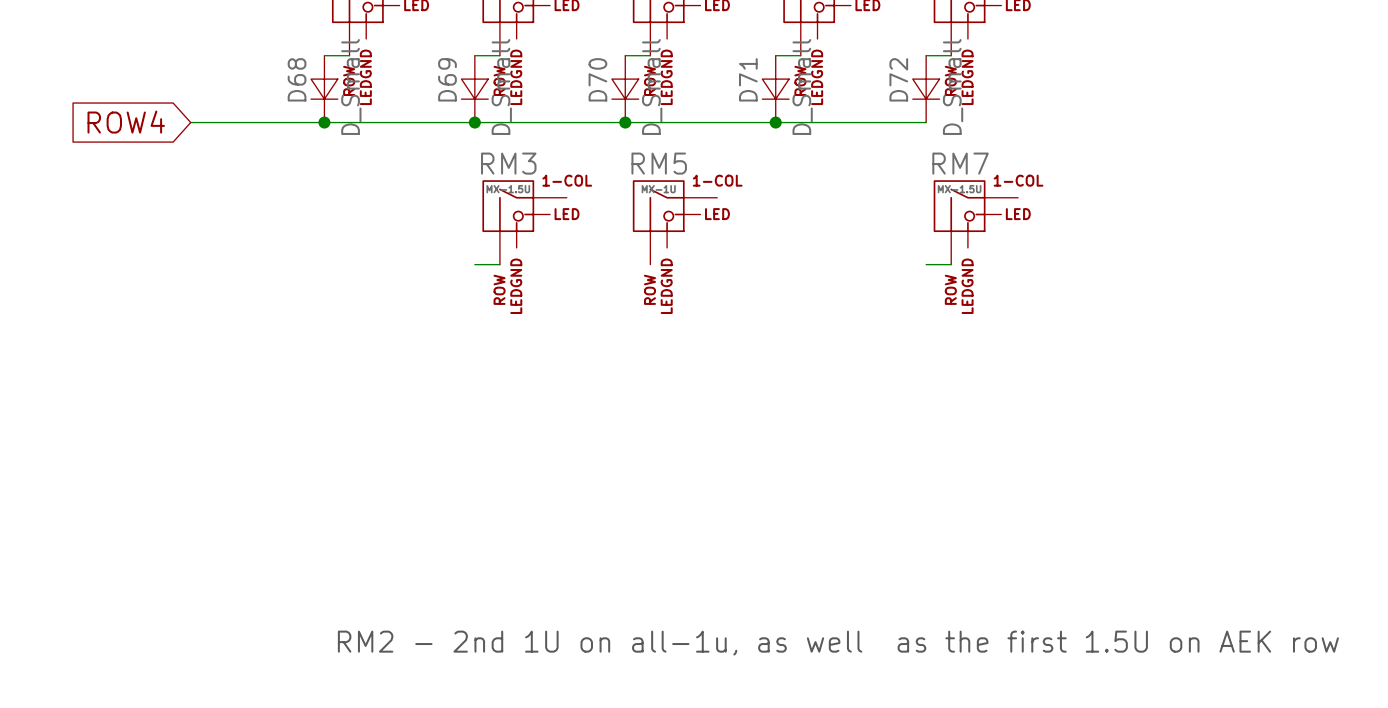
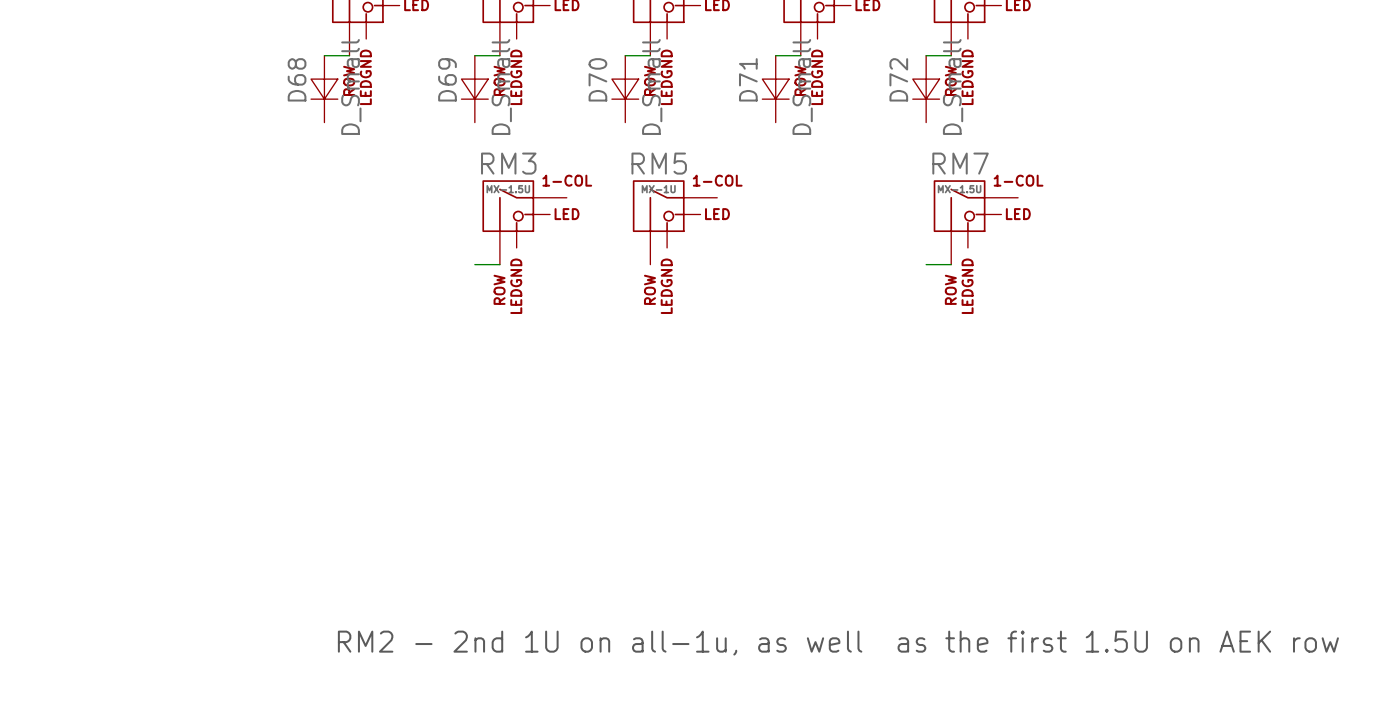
global label: ROW4 (126, 122) -> none
wire: (190, 122) (926, 122) -> none
junction: (324, 122) -> none
junction: (474, 122) -> none
junction: (625, 122) -> none
junction: (775, 122) -> none

